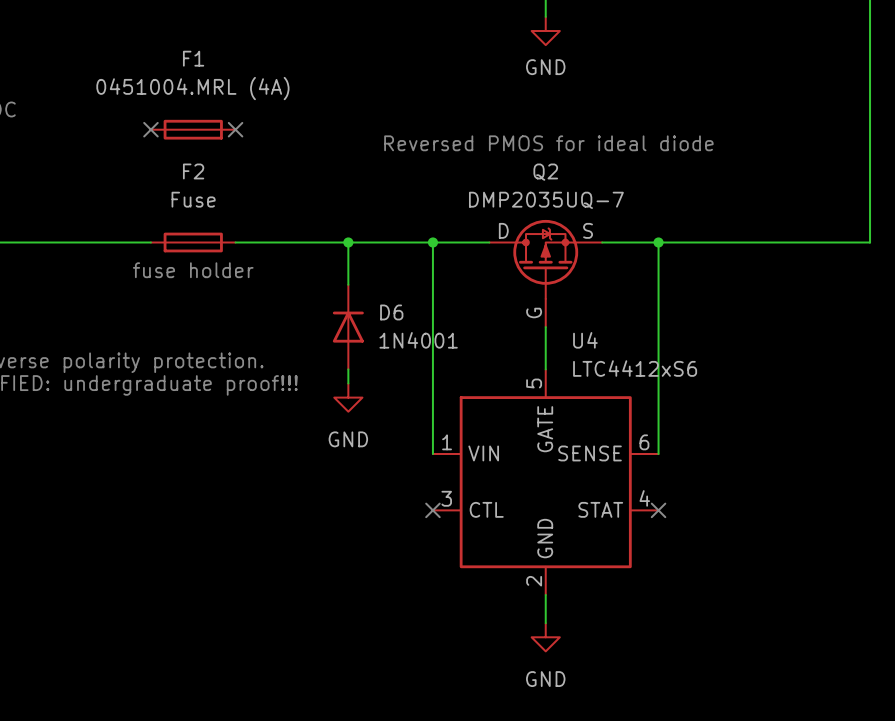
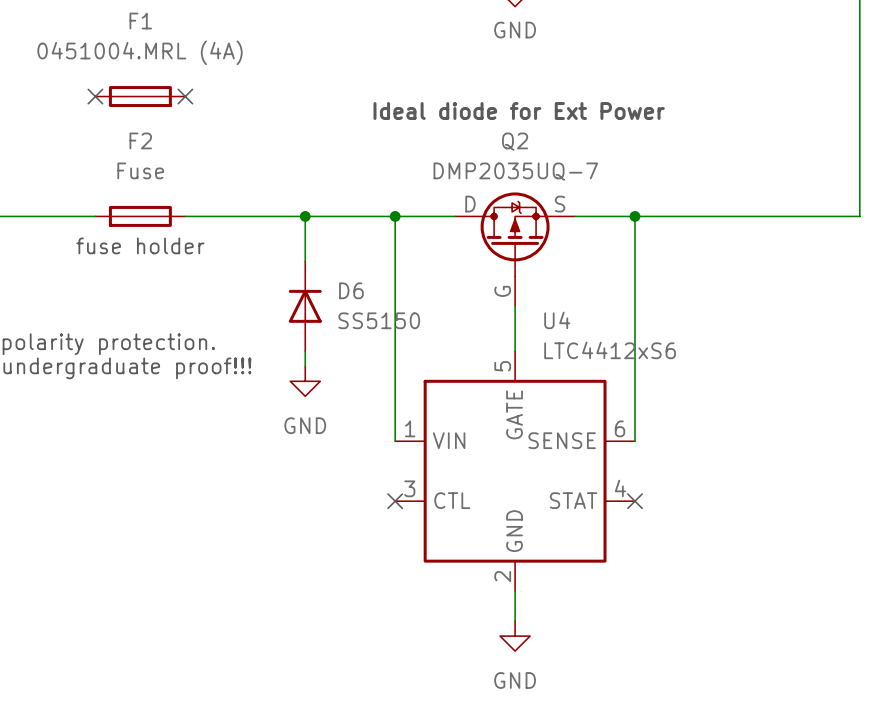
text: Reversed PMOS for ideal diode (548, 143) -> Ideal diode for Ext Power (519, 111)
D6 value: 1N4001 (418, 340) -> SS5150 (379, 320)

